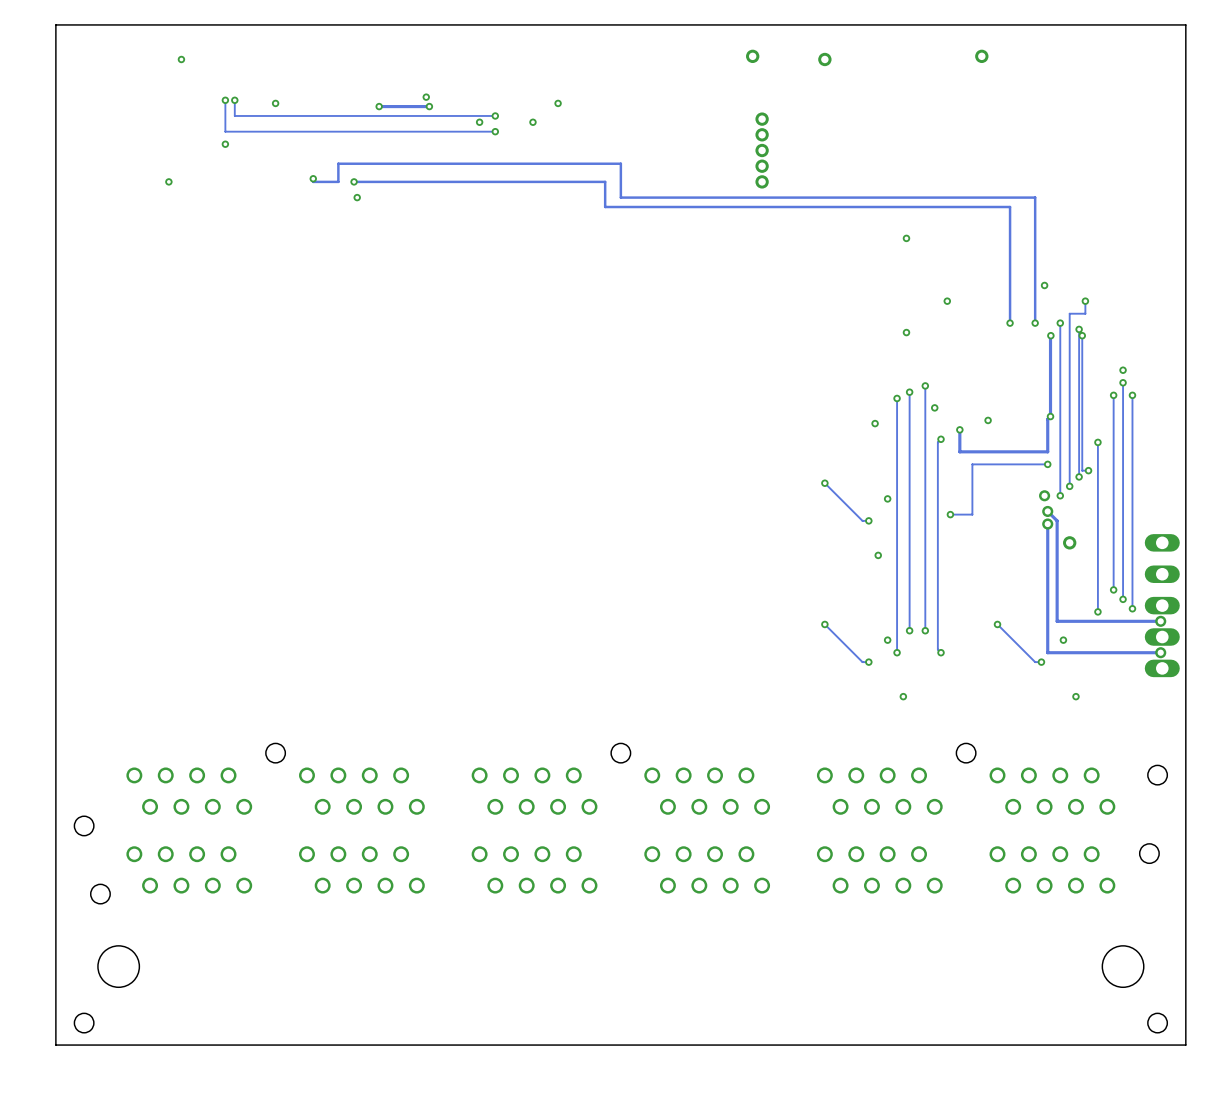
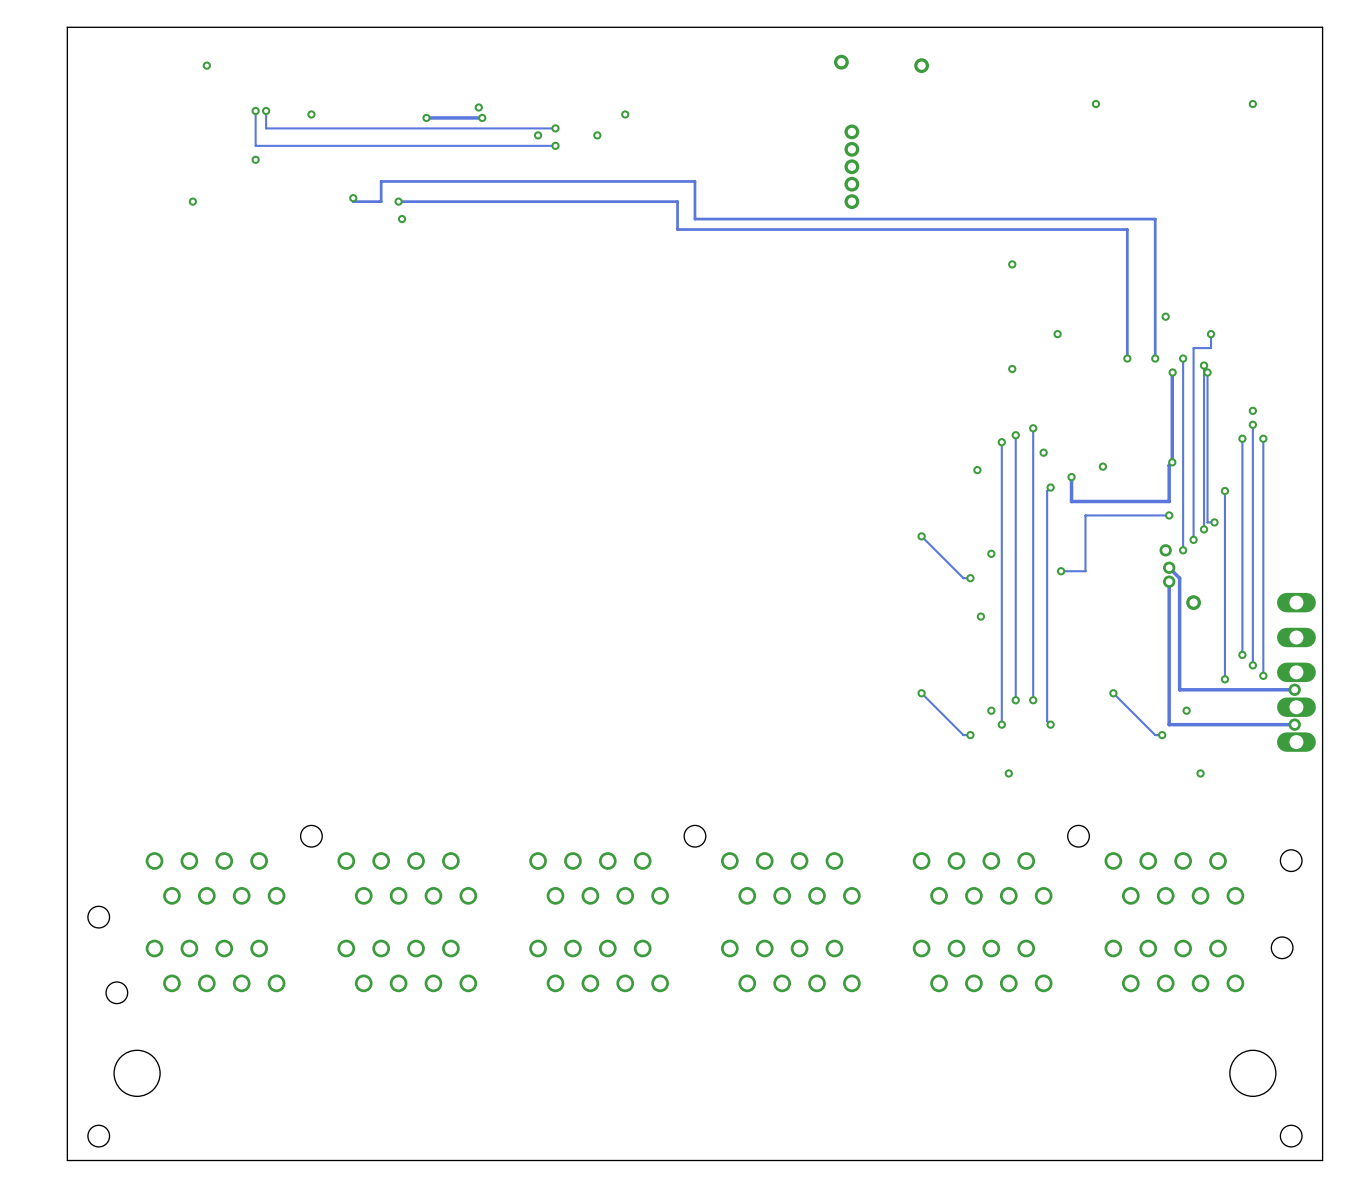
via: (981, 56) -> none
via: none -> (1095, 104)
via: none -> (1252, 104)

